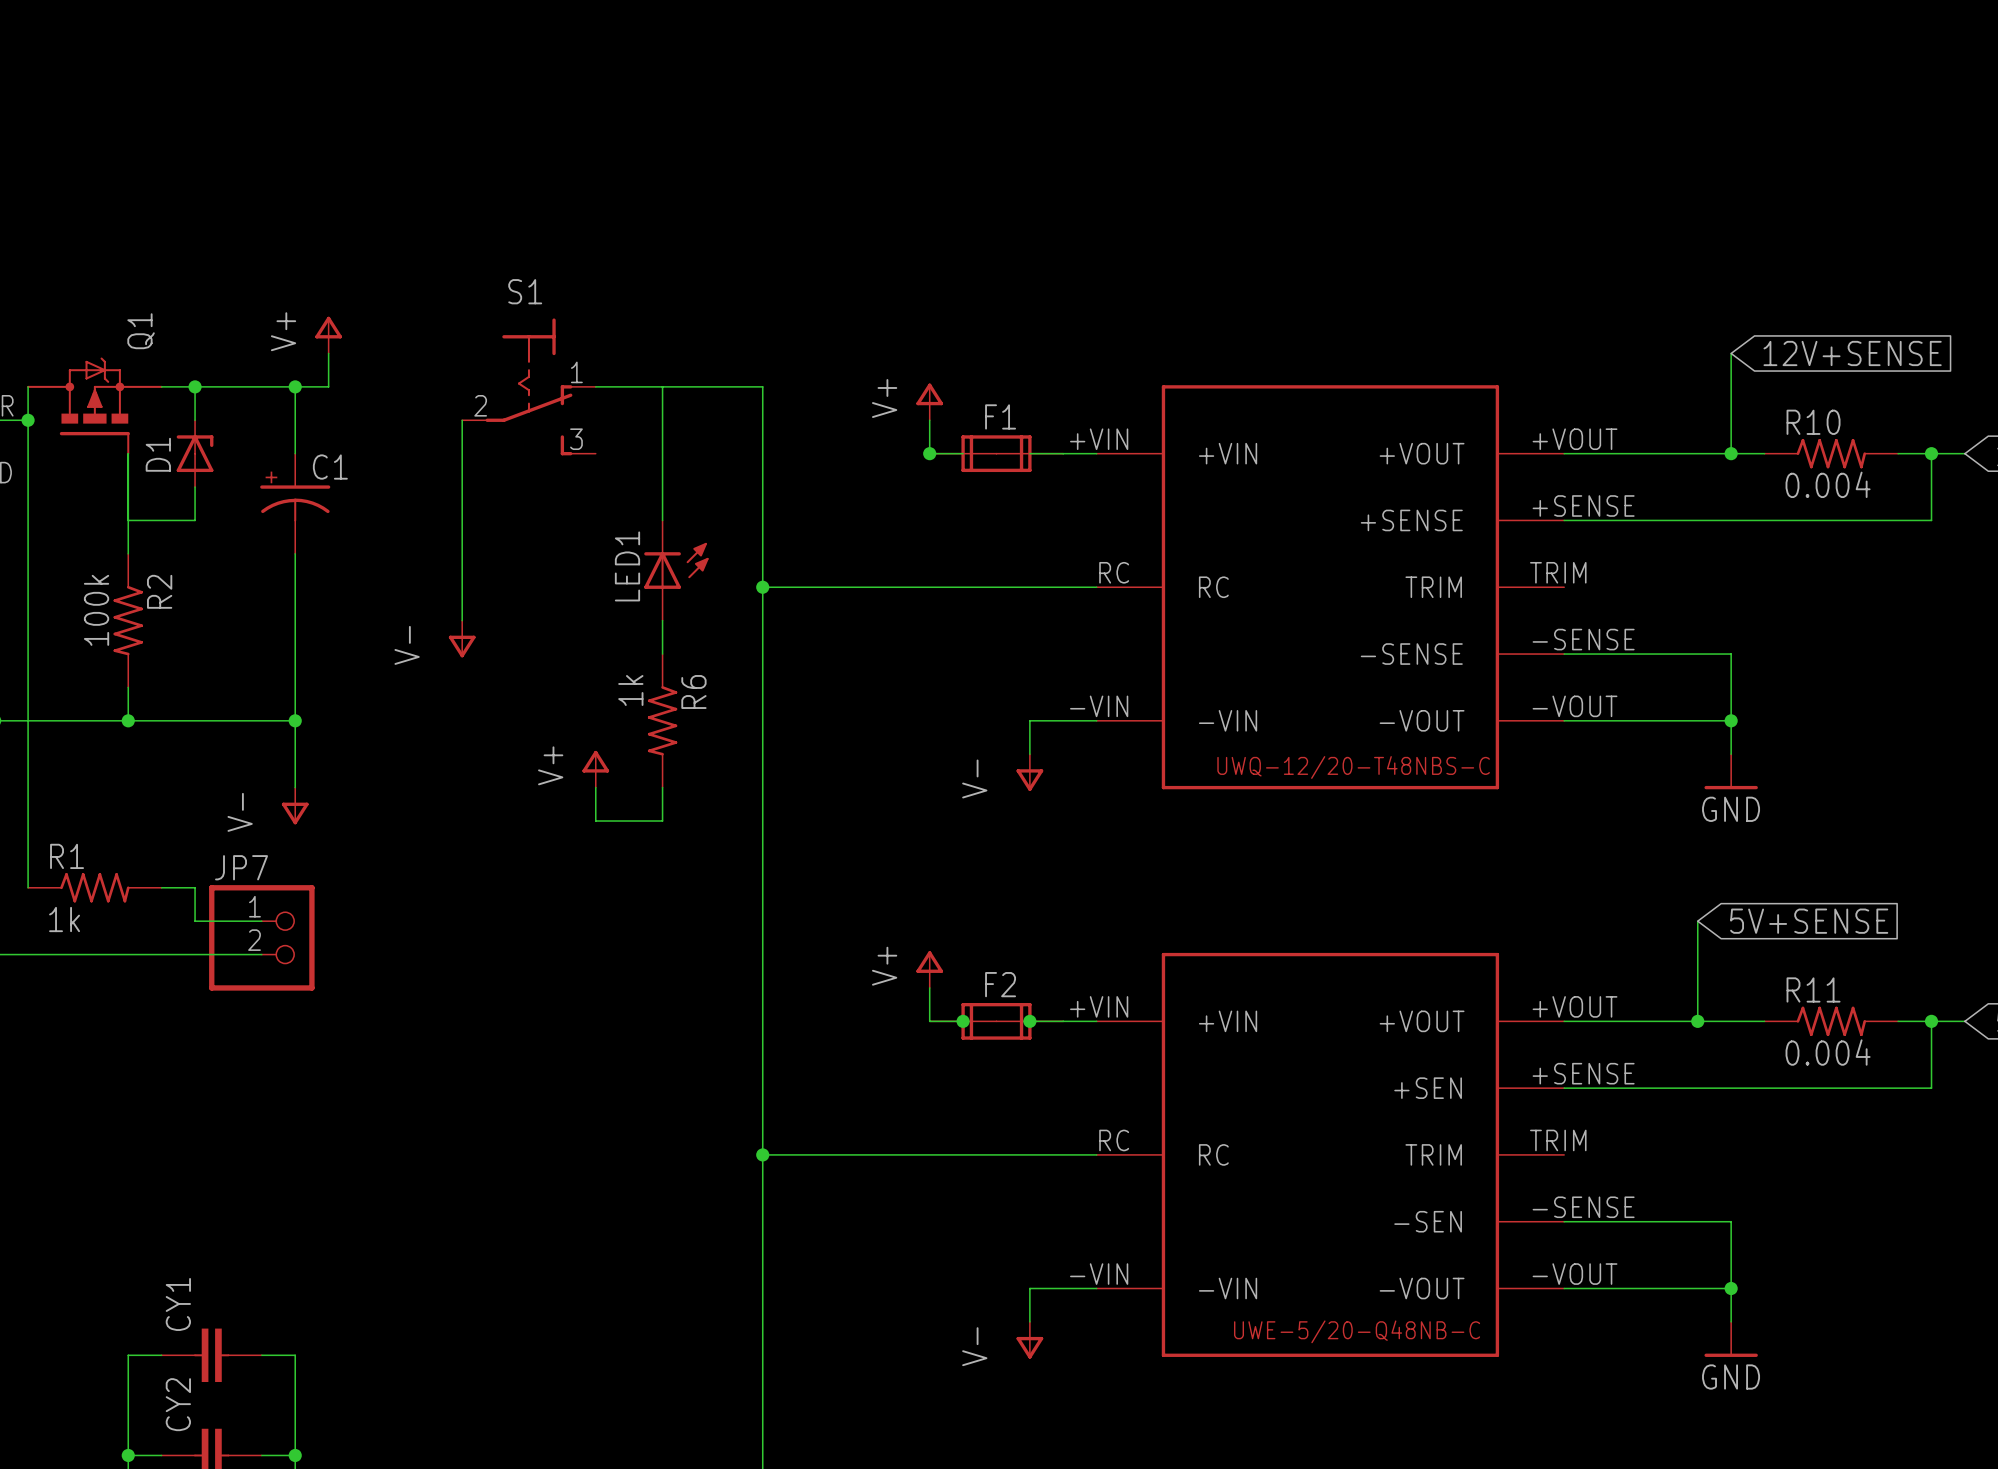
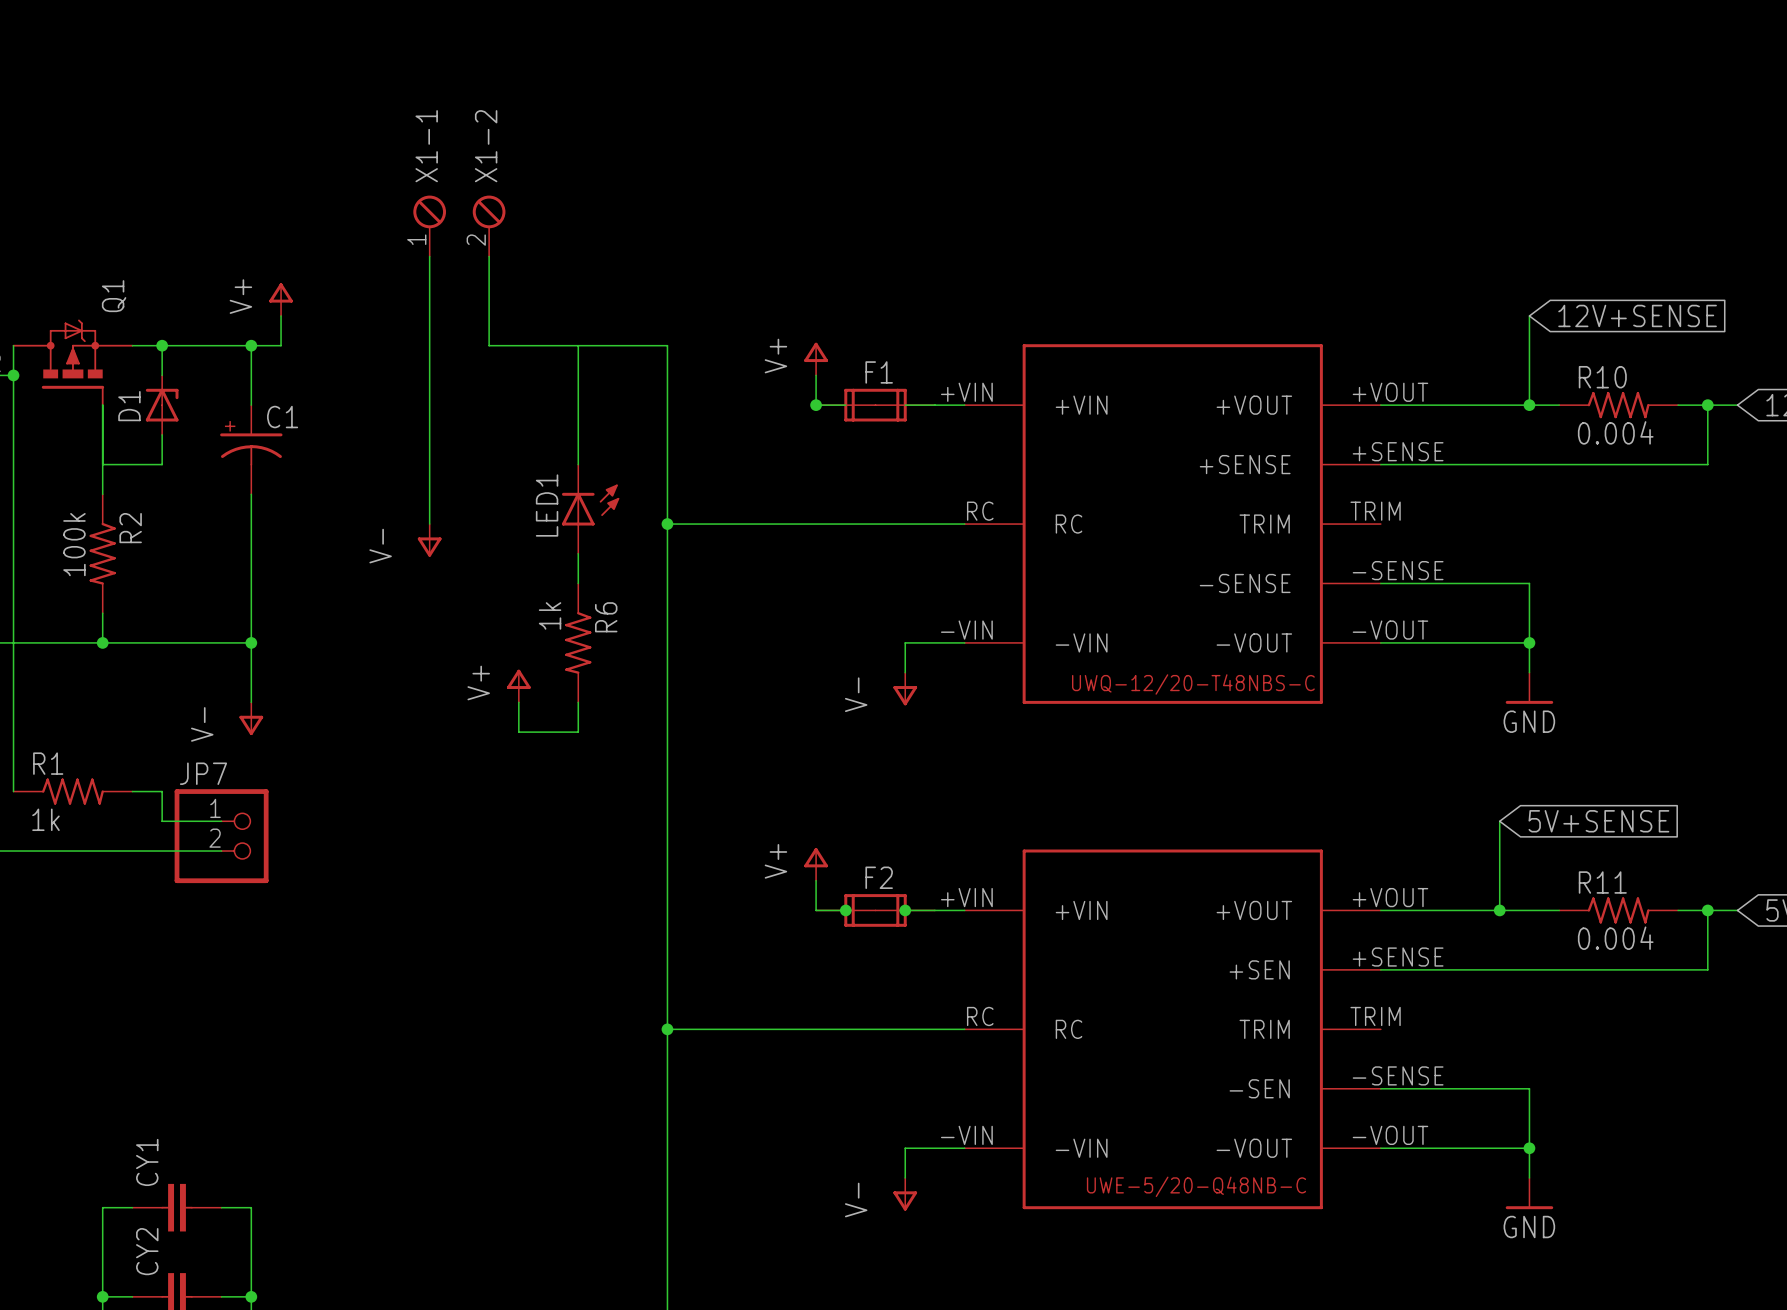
X1-1: none -> (429, 226)
X1-2: none -> (489, 226)
wire: none -> (429, 256) (429, 524)
wire: none -> (489, 256) (489, 345) (518, 345)
S1: (528, 386) -> none
wire: (462, 420) (462, 620) -> none
power symbol position: V- (462, 639) -> V- (429, 540)

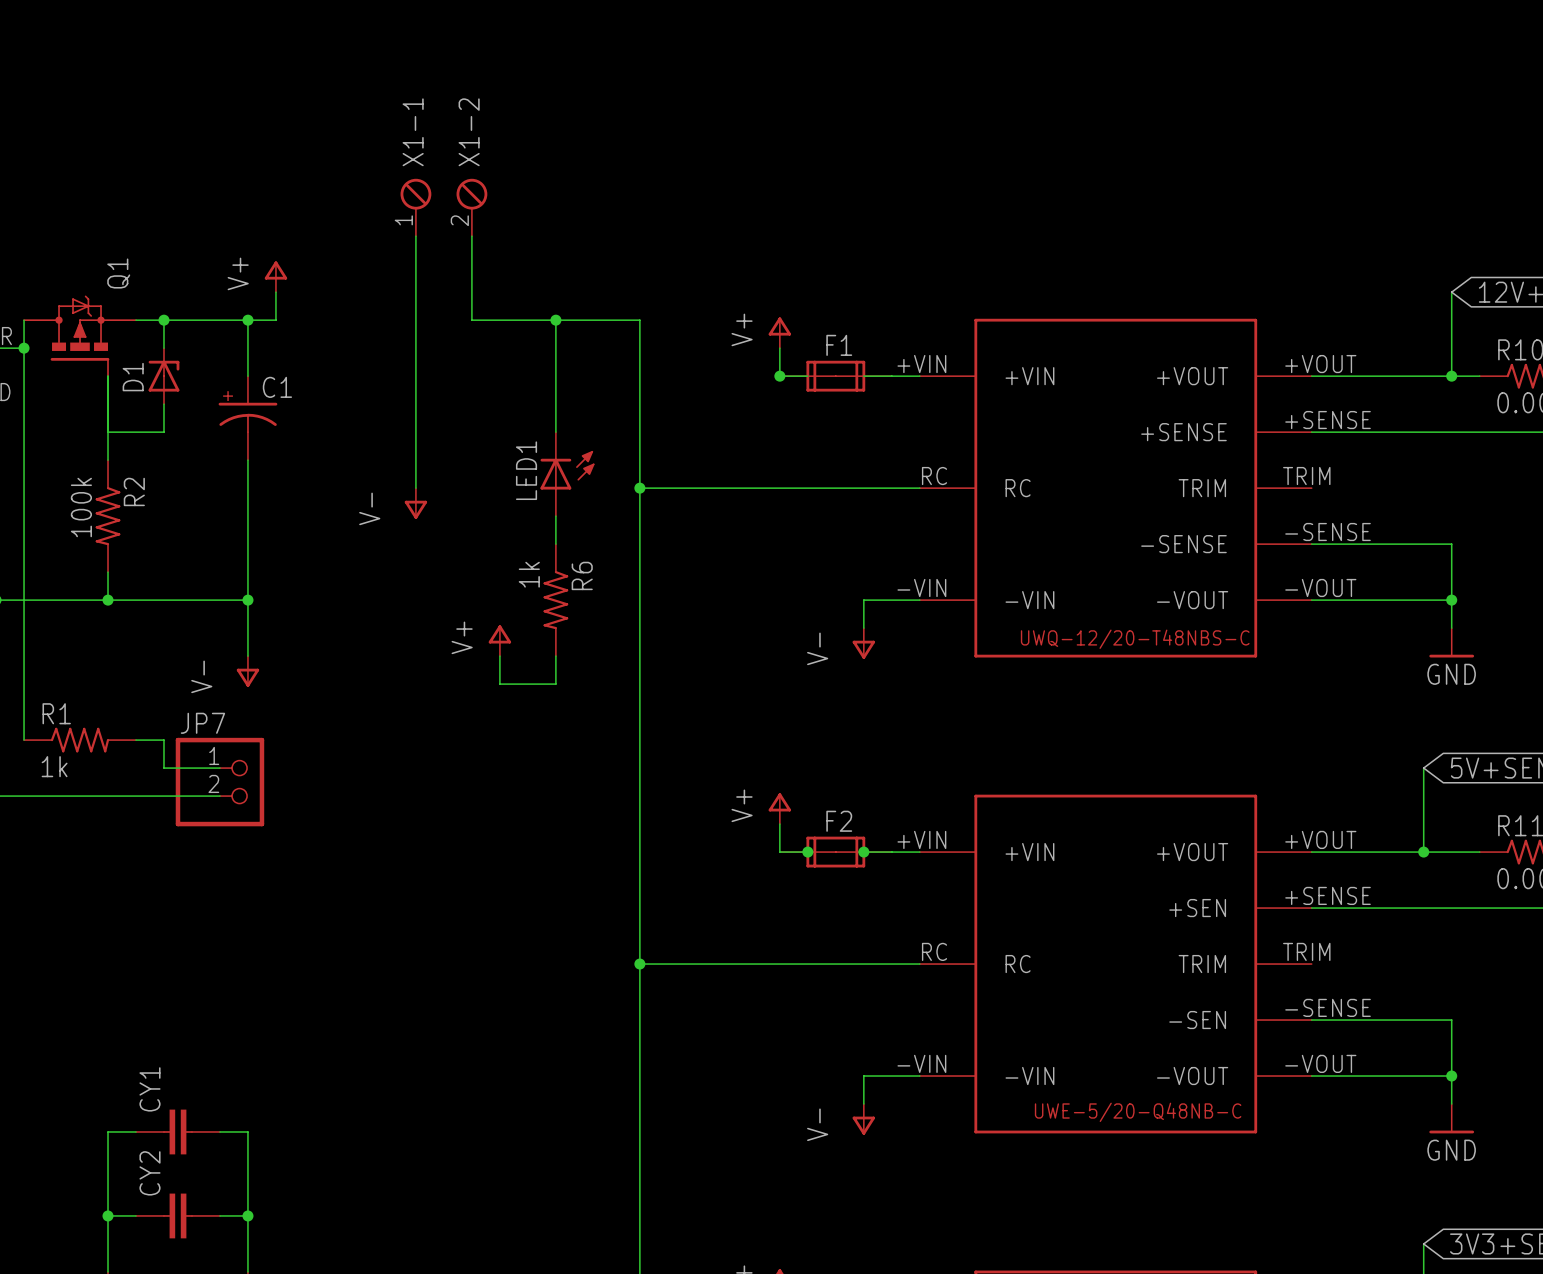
junction: none -> (555, 320)

